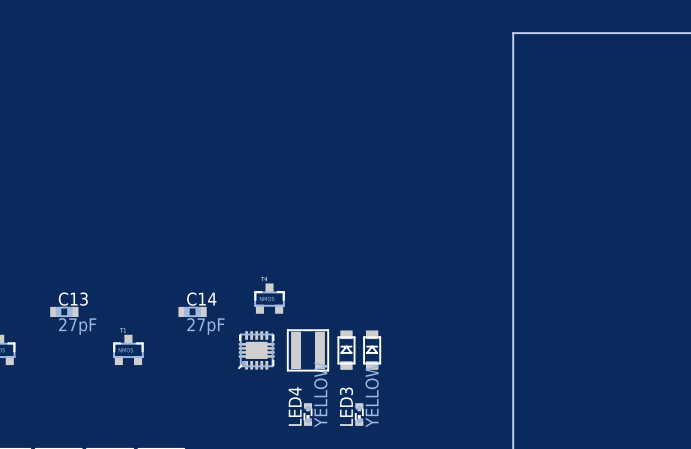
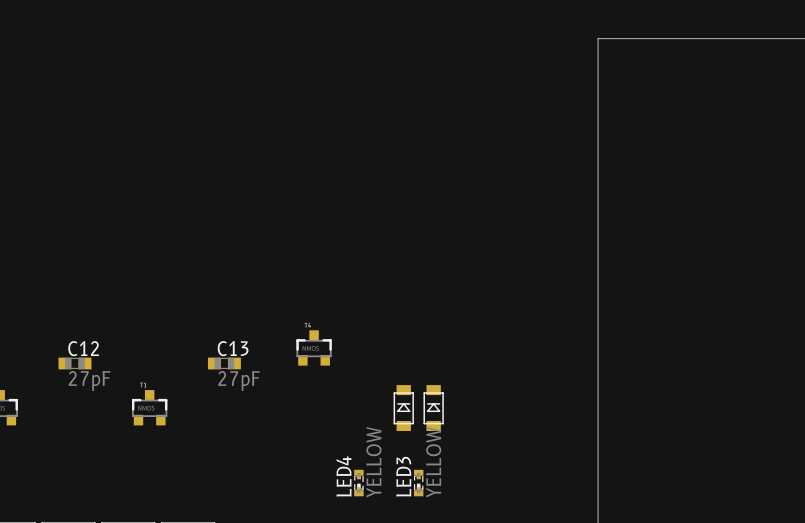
C13 name: C13 (73, 299) -> C12 (83, 348)
C14 name: C14 (201, 299) -> C13 (233, 348)
part: (256, 350) -> none
part: (308, 350) -> none

